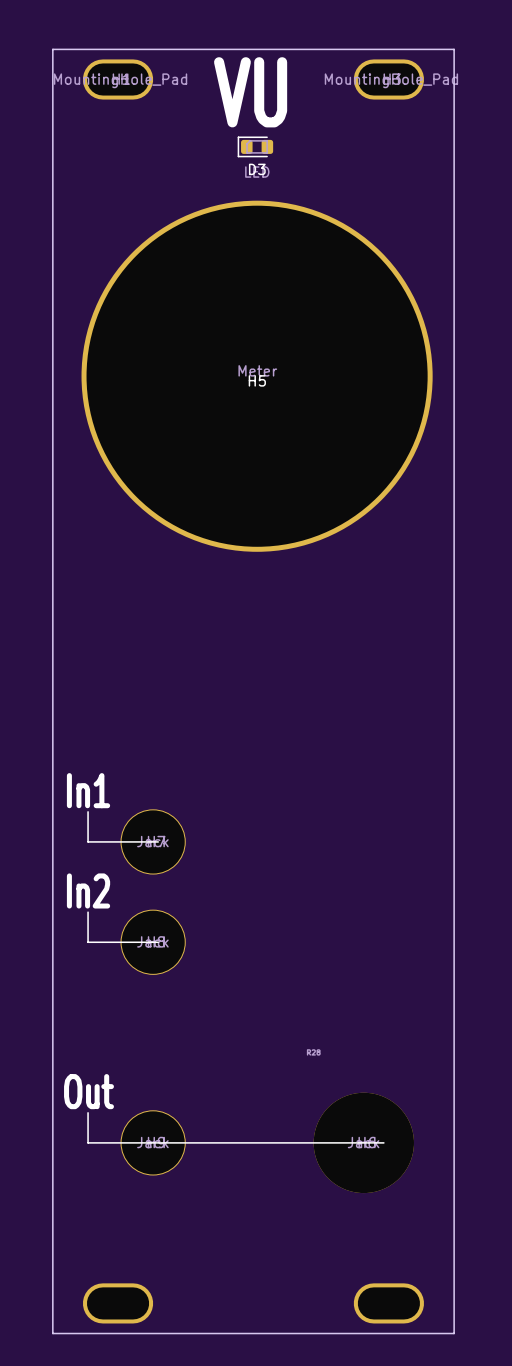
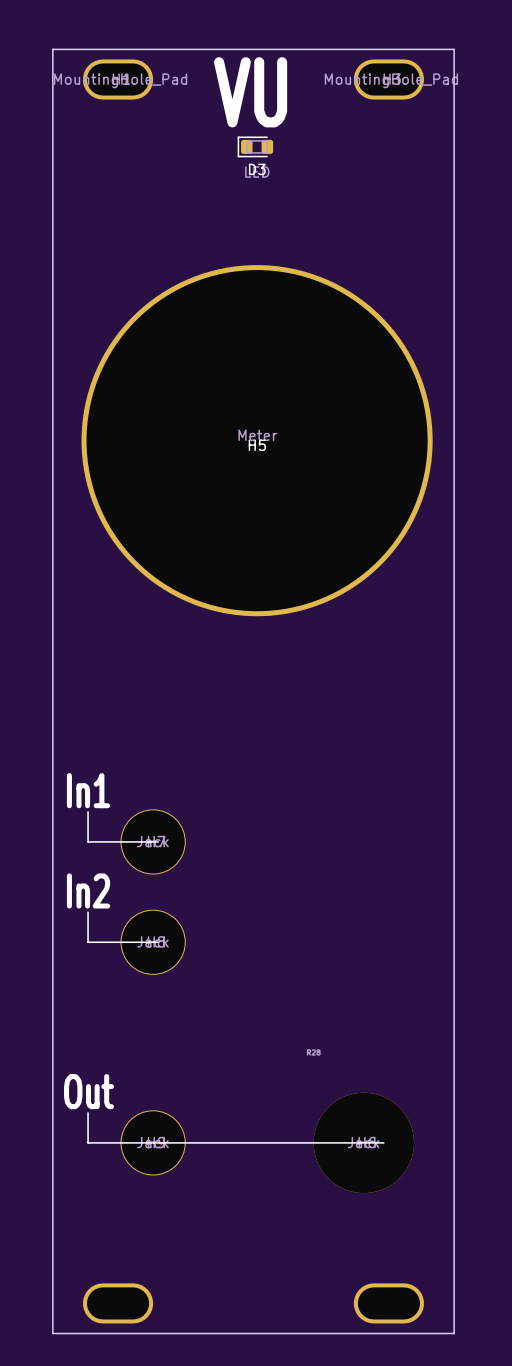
H5 position: (257, 376) -> (257, 440)

